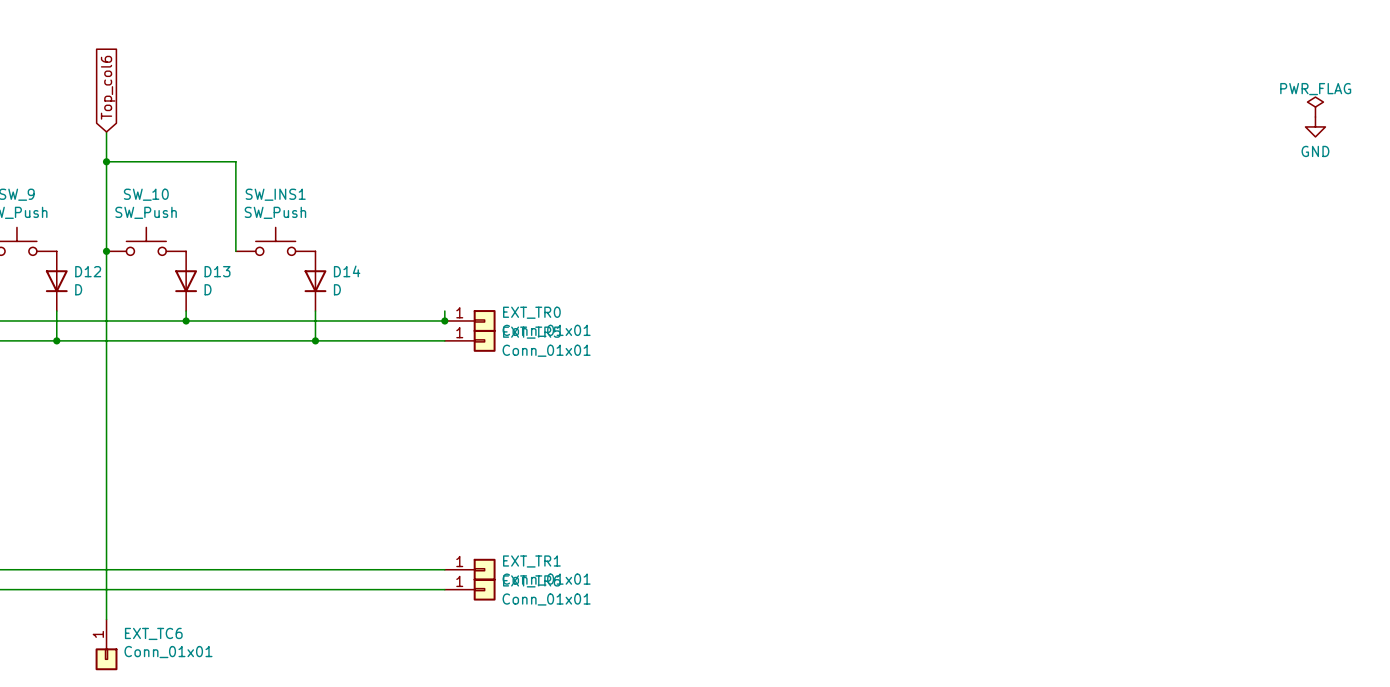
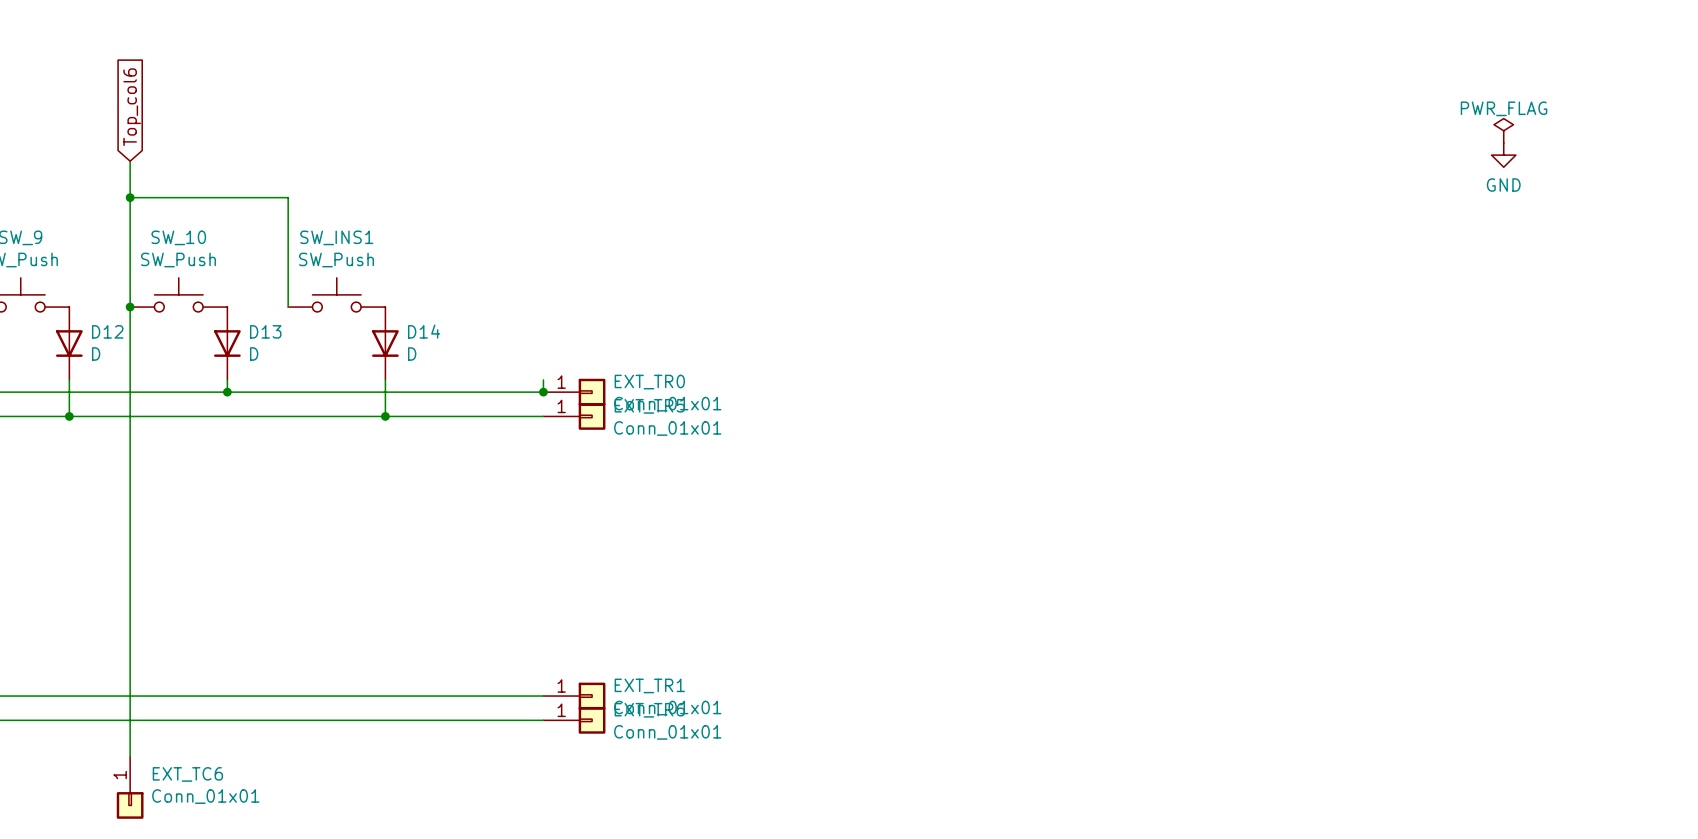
power symbol position: PWR_FLAG (1315, 107) -> PWR_FLAG (1503, 130)
power symbol position: GND (1315, 126) -> GND (1503, 155)

